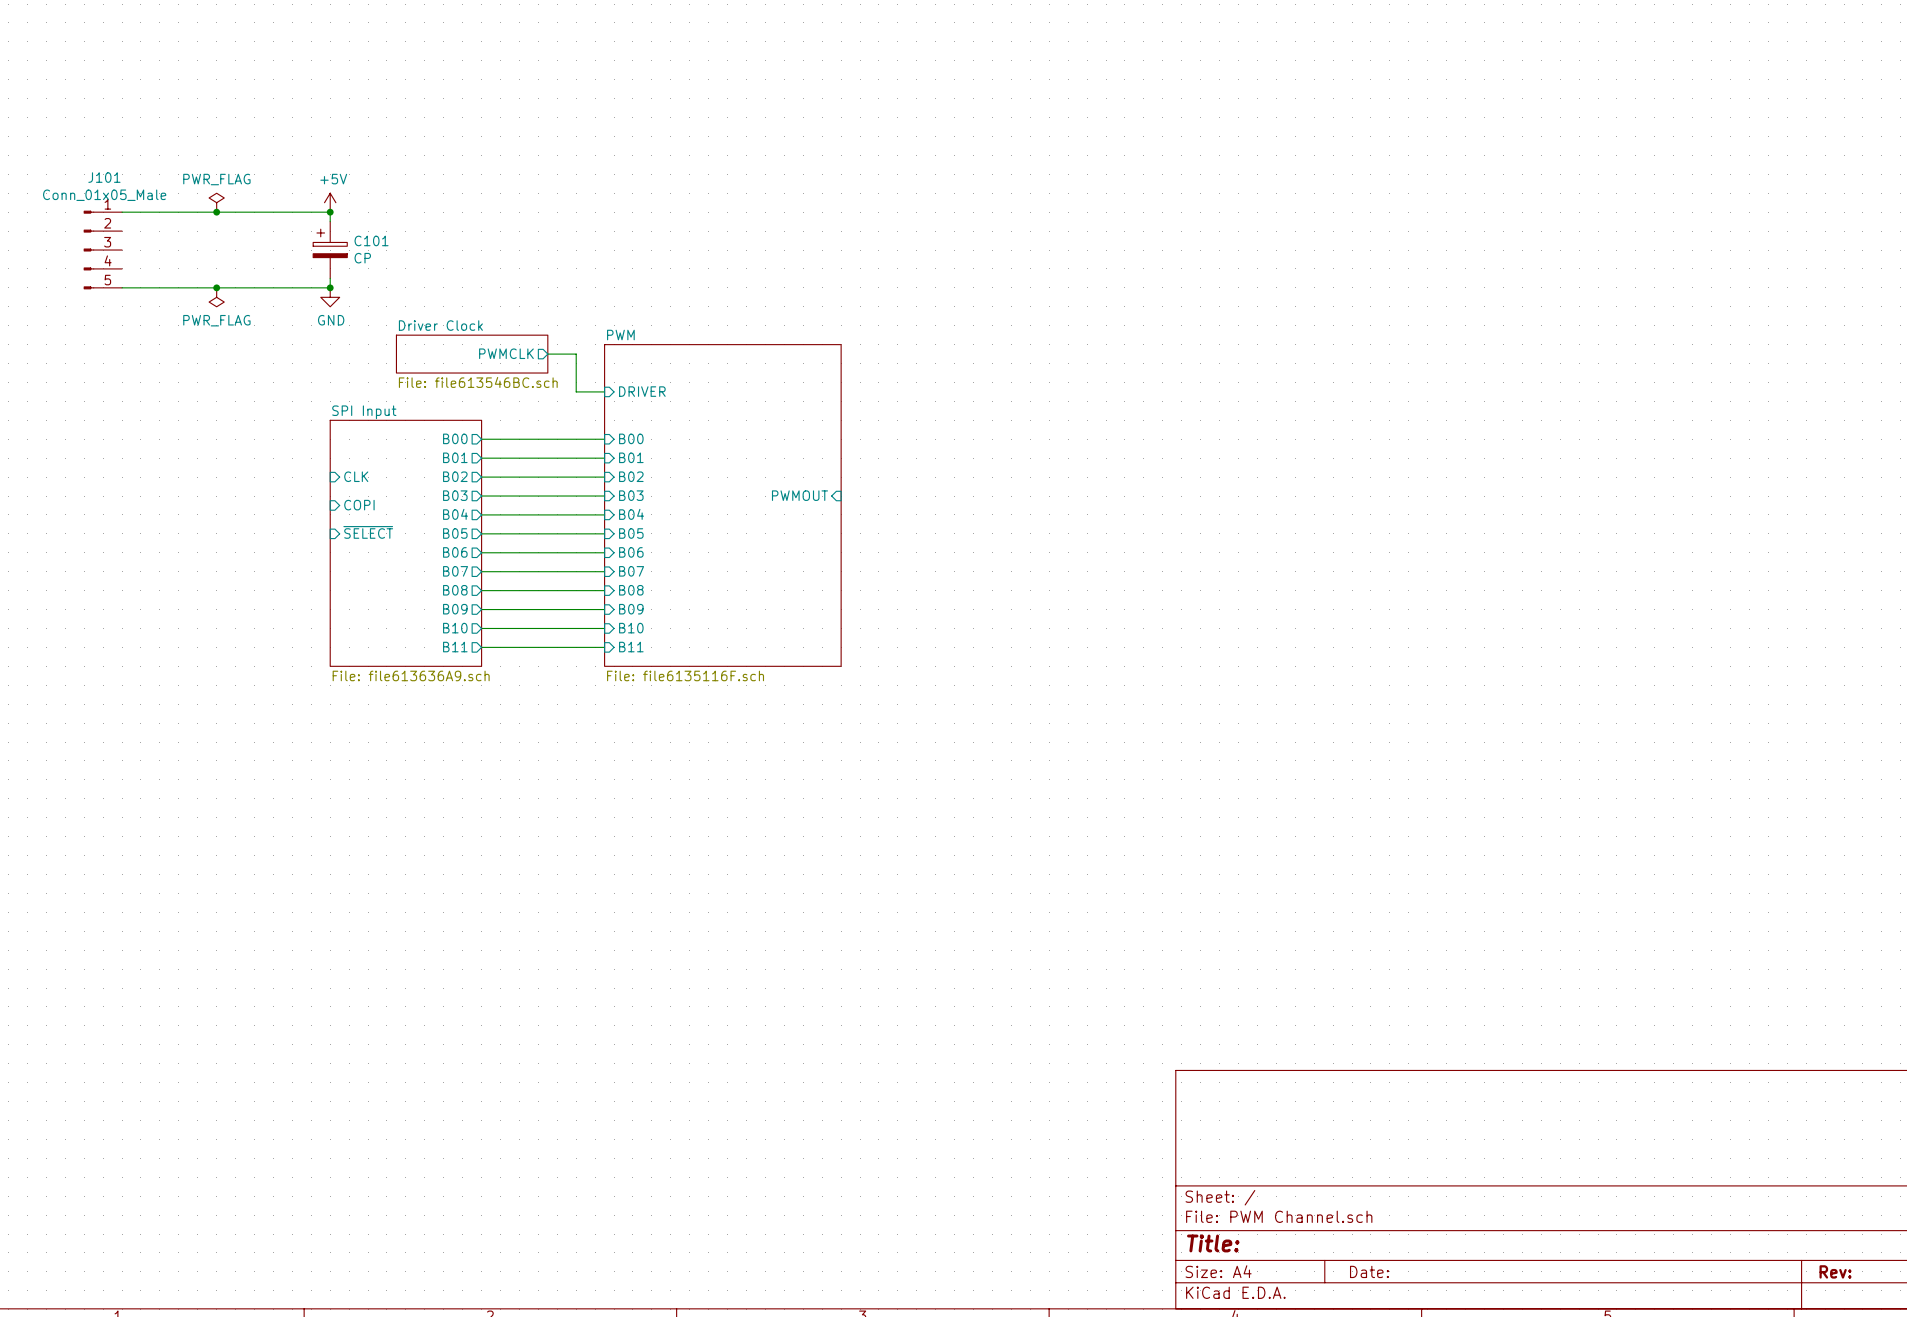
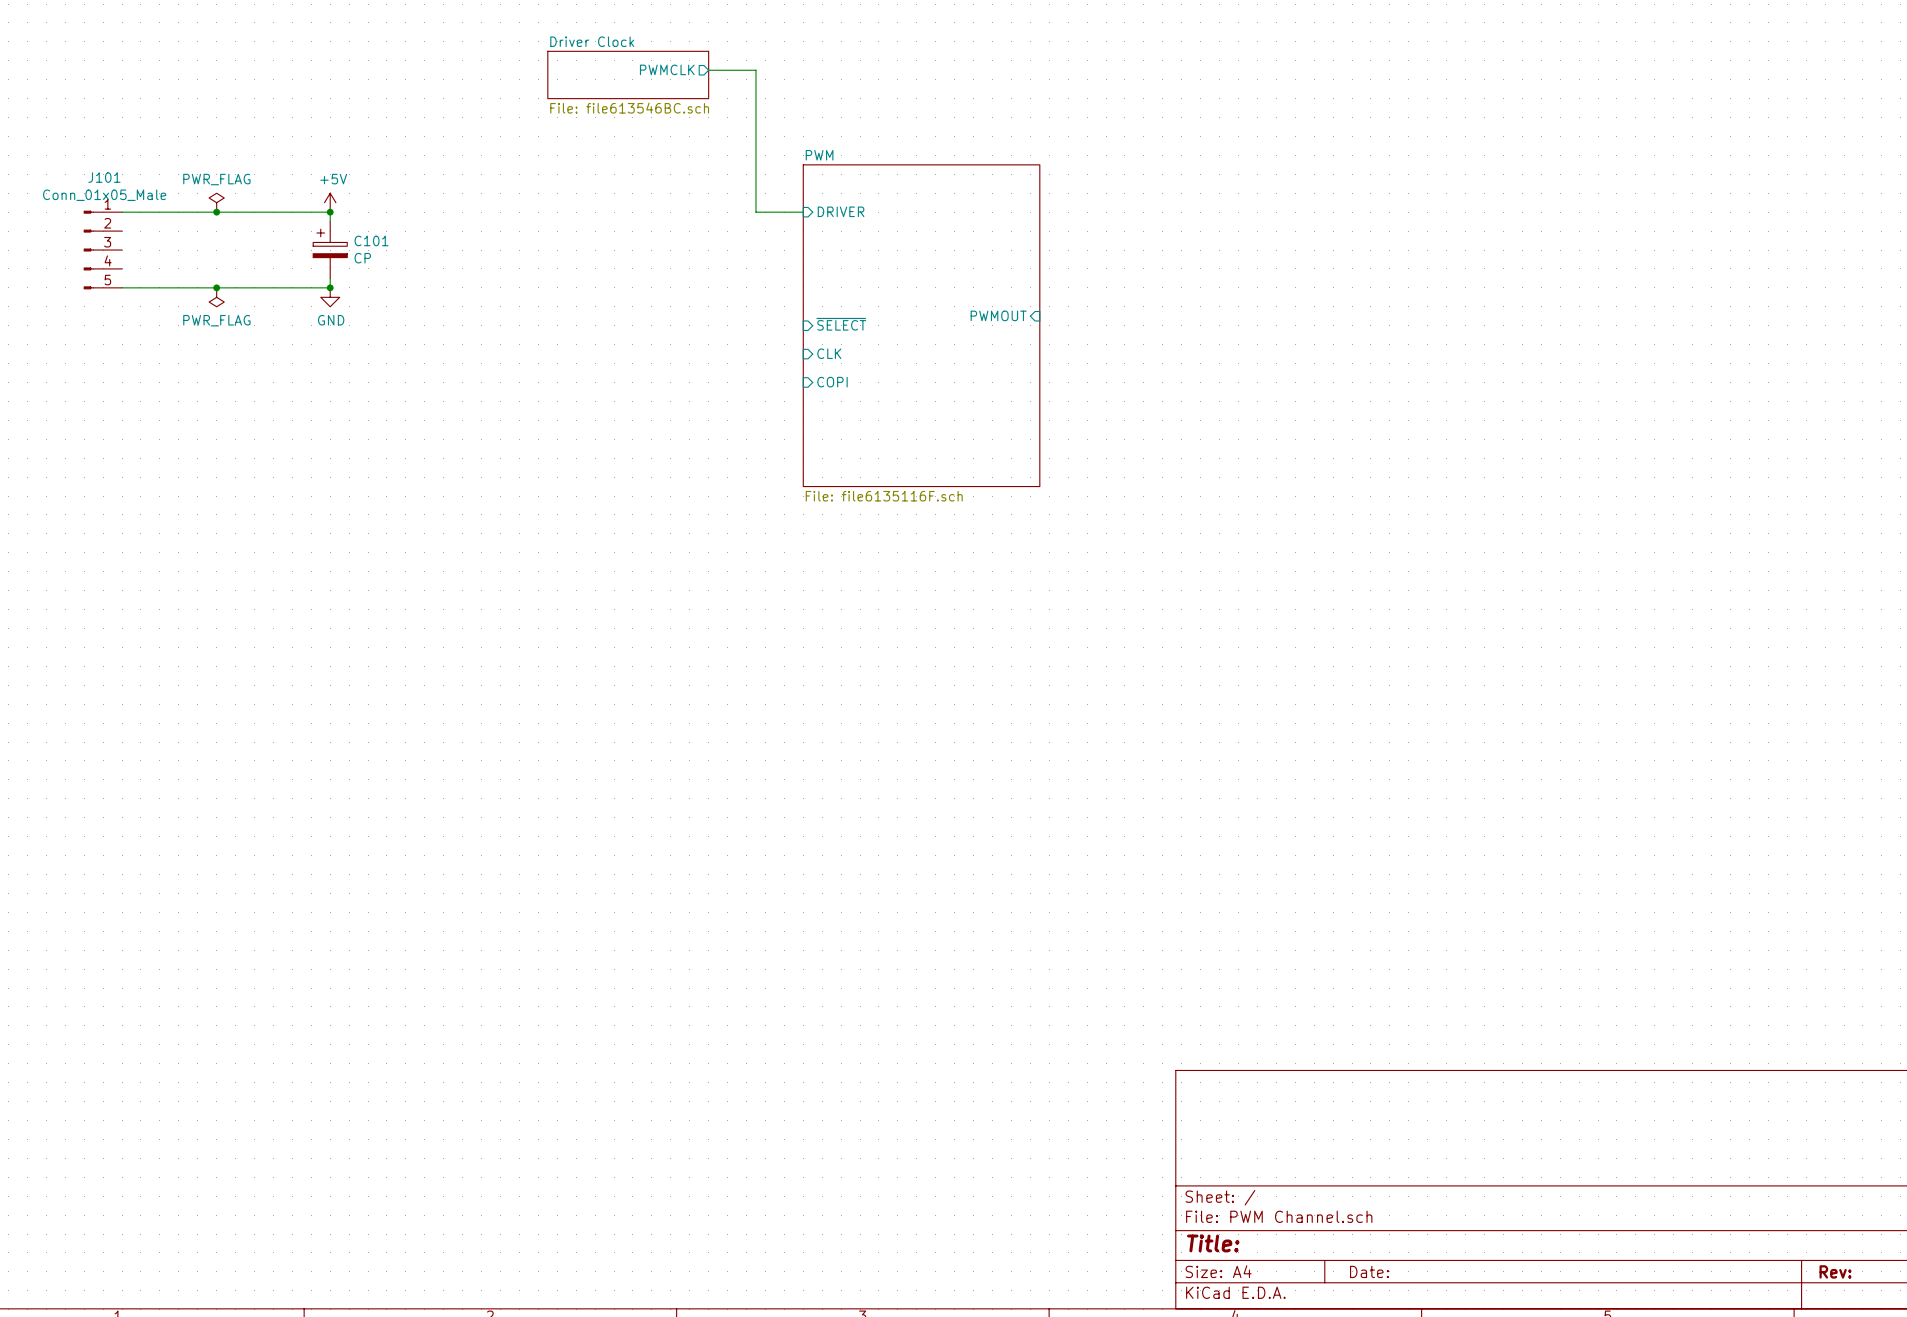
sheet pin: none -> PWMCLK (667, 69)
wire: none -> (708, 70) (755, 70) (755, 212) (803, 212)
sheet Driver Clock: none -> File: file613546BC.sch (628, 74)
sheet pin: none -> DRIVER (841, 211)
sheet pin: none -> PWMOUT (998, 315)
sheet pin: none -> ~{SELECT} (841, 324)
sheet PWM: none -> File: file6135116F.sch (921, 325)
sheet pin: PWMCLK (506, 353) -> none
sheet pin: none -> CLK (829, 353)
sheet Driver Clock: File: file613546BC.sch (472, 354) -> none
wire: (547, 354) (576, 354) (576, 391) (604, 391) -> none
sheet pin: none -> COPI (832, 382)
sheet pin: DRIVER (642, 391) -> none
sheet pin: B00 (455, 438) -> none
sheet pin: B00 (631, 438) -> none
wire: (481, 439) (604, 439) -> none
sheet pin: B01 (455, 457) -> none
sheet pin: B01 (631, 457) -> none
wire: (481, 458) (604, 458) -> none
sheet pin: CLK (356, 476) -> none
sheet pin: B02 (455, 476) -> none
sheet pin: B02 (631, 476) -> none
wire: (481, 477) (604, 477) -> none
sheet pin: B03 (455, 495) -> none
sheet pin: B03 (631, 495) -> none
sheet pin: PWMOUT (799, 495) -> none
wire: (481, 496) (604, 496) -> none
sheet pin: COPI (359, 505) -> none
sheet PWM: File: file6135116F.sch (722, 505) -> none
sheet pin: B04 (455, 514) -> none
wire: (481, 514) (604, 514) -> none
sheet pin: B04 (631, 514) -> none
sheet pin: ~{SELECT} (368, 532) -> none
sheet pin: B05 (455, 533) -> none
wire: (481, 533) (604, 533) -> none
sheet pin: B05 (631, 533) -> none
sheet SPI Input: File: file613636A9.sch (405, 543) -> none
sheet pin: B06 (455, 552) -> none
wire: (481, 552) (604, 552) -> none
sheet pin: B06 (631, 552) -> none
sheet pin: B07 (455, 571) -> none
wire: (481, 571) (604, 571) -> none
sheet pin: B07 (631, 571) -> none
sheet pin: B08 (455, 590) -> none
wire: (481, 590) (604, 590) -> none
sheet pin: B08 (631, 590) -> none
sheet pin: B09 (455, 609) -> none
wire: (481, 609) (604, 609) -> none
sheet pin: B09 (631, 609) -> none
sheet pin: B10 (455, 628) -> none
wire: (481, 628) (604, 628) -> none
sheet pin: B10 (631, 628) -> none
sheet pin: B11 (455, 647) -> none
wire: (481, 647) (604, 647) -> none
sheet pin: B11 (631, 647) -> none

